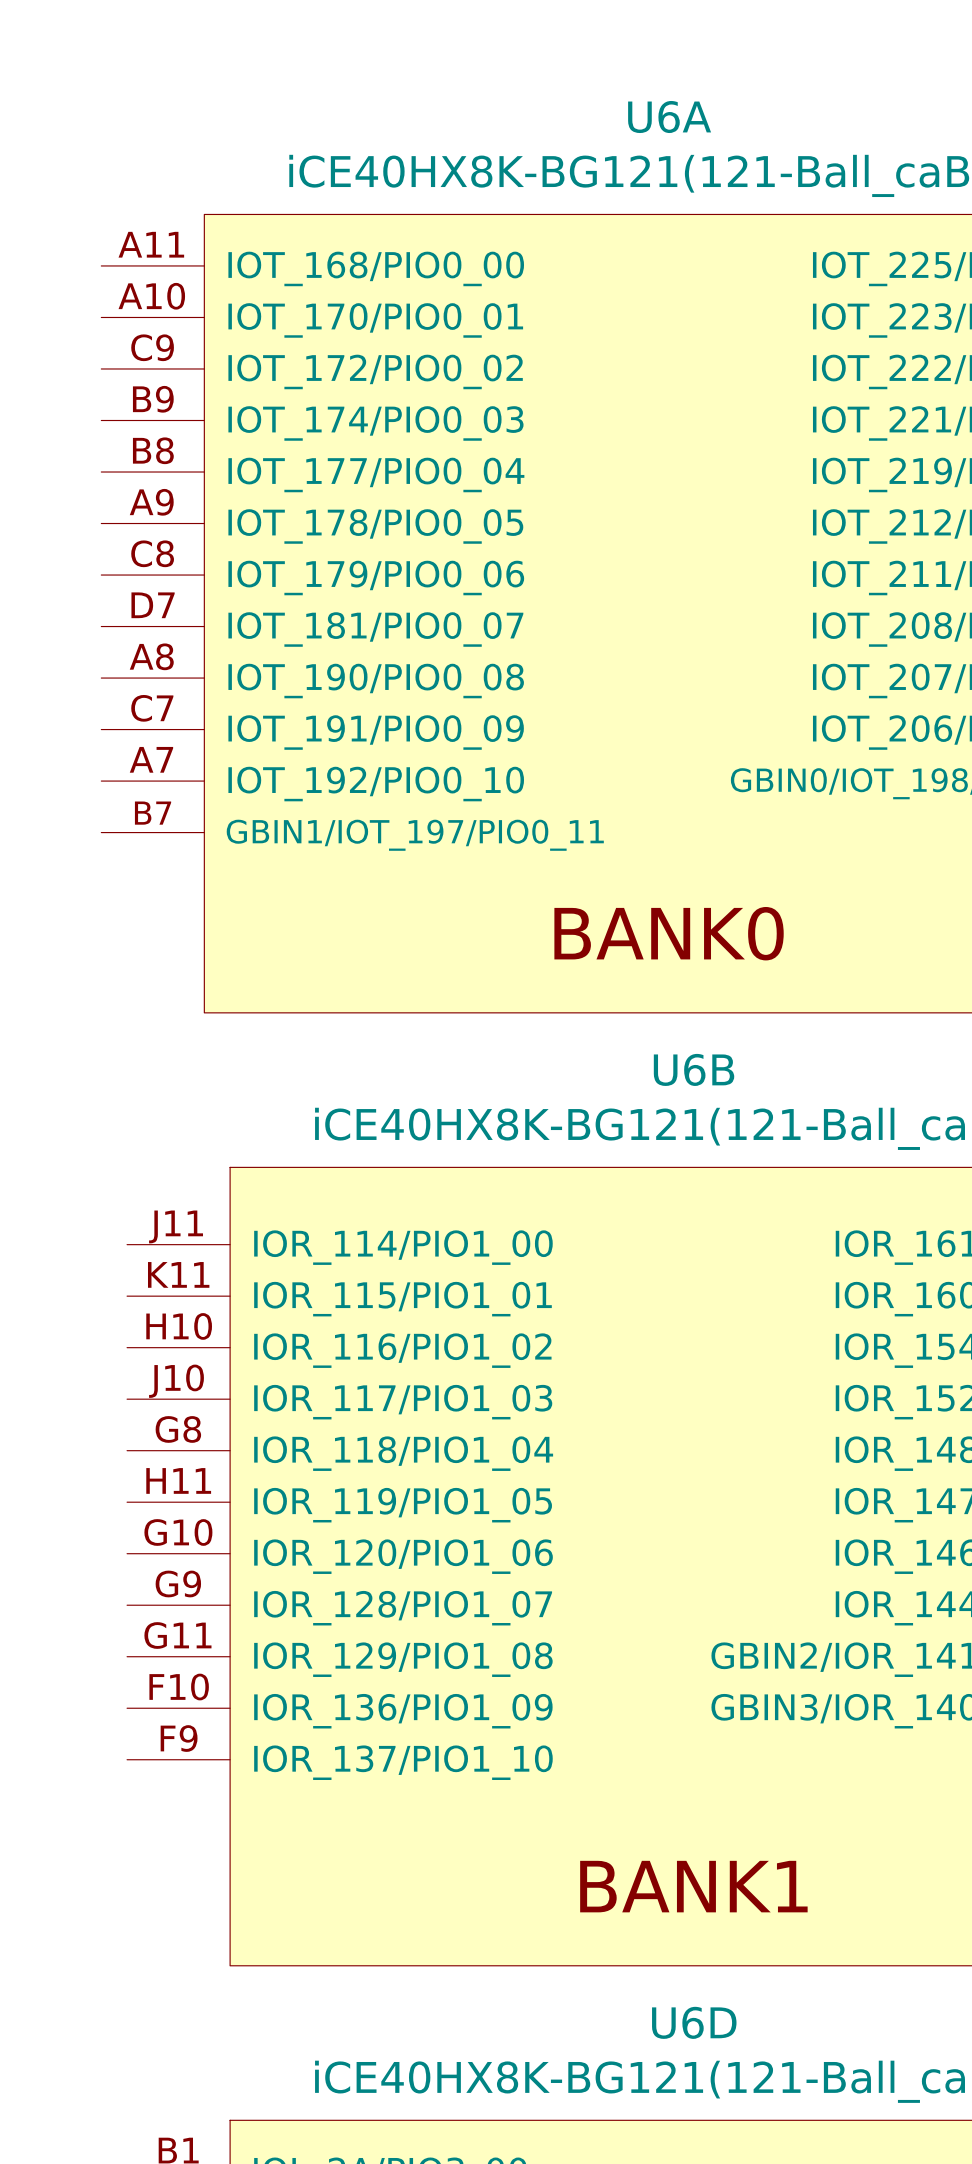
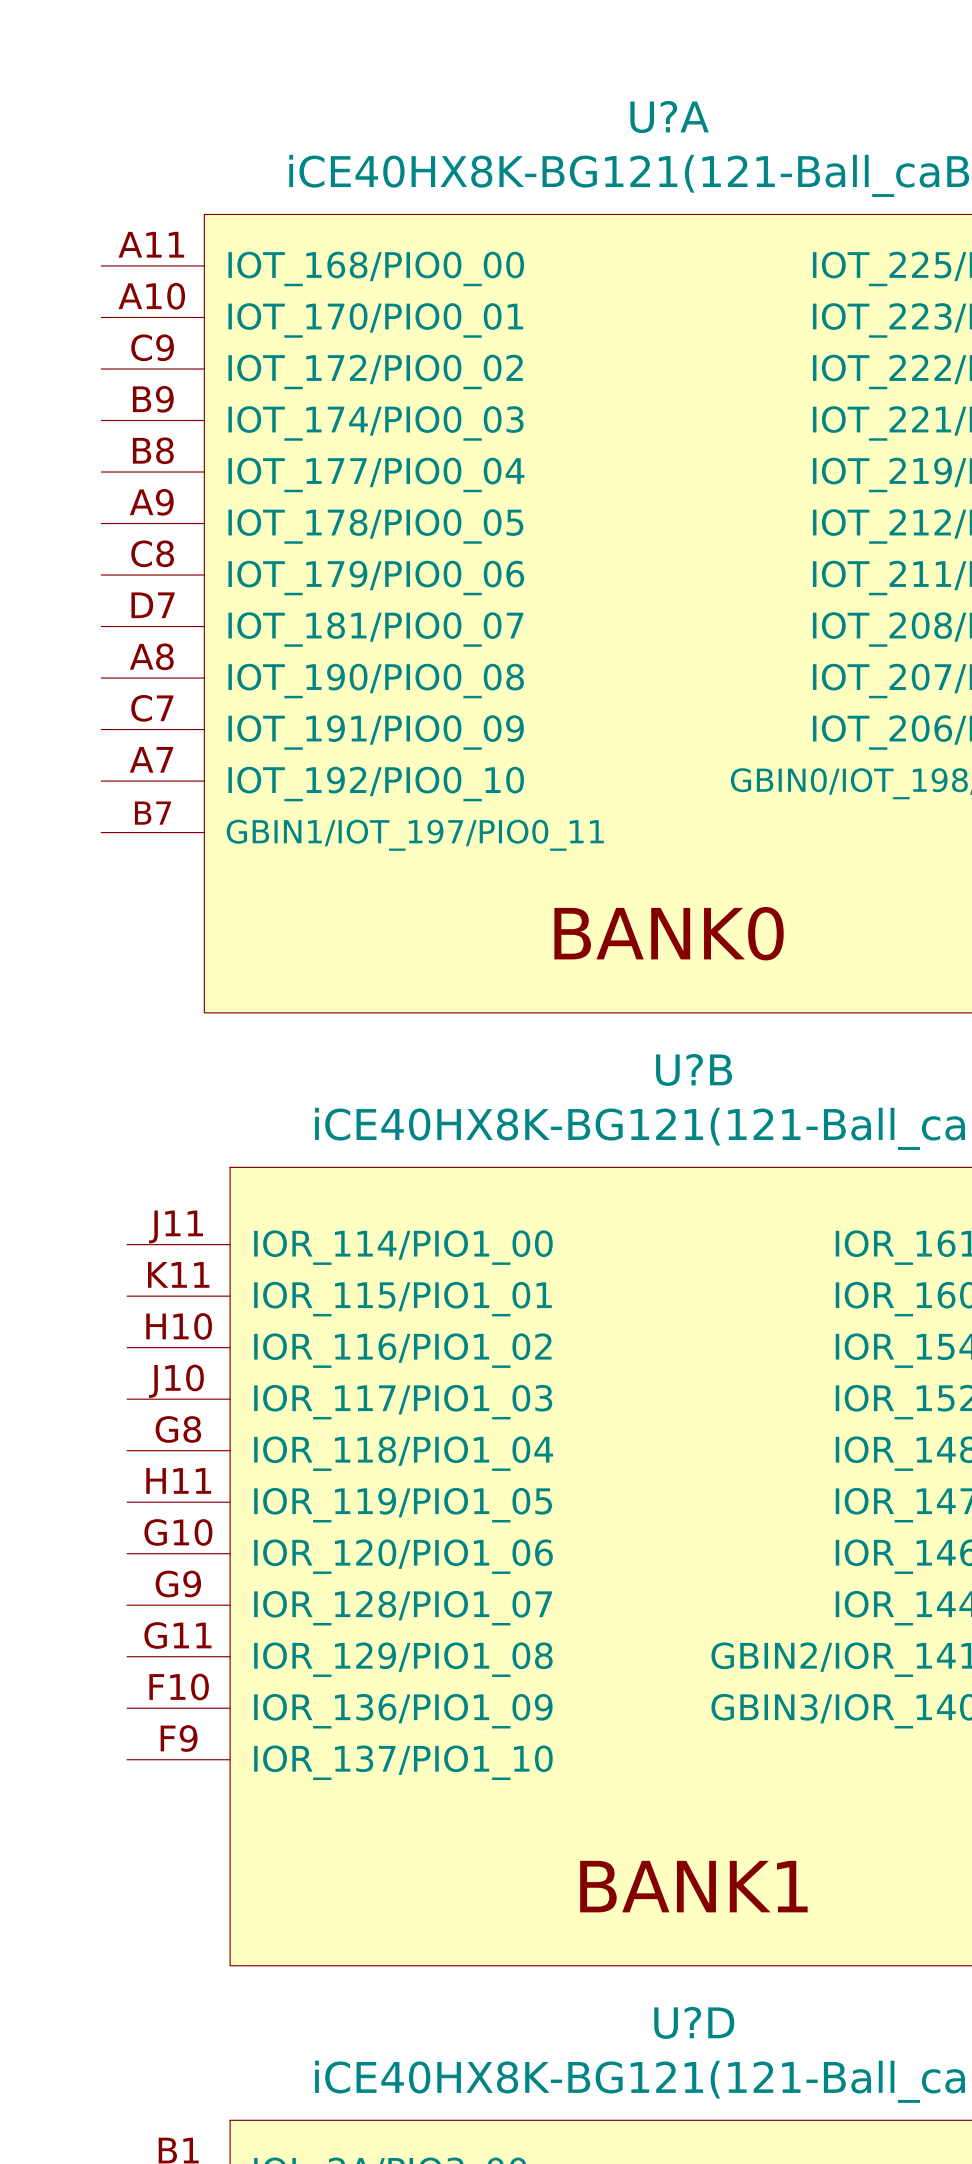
U6A name: U6A (669, 117) -> U?A (669, 117)
U6B name: U6B (694, 1069) -> U?B (694, 1069)
U6D name: U6D (694, 2022) -> U?D (694, 2022)

